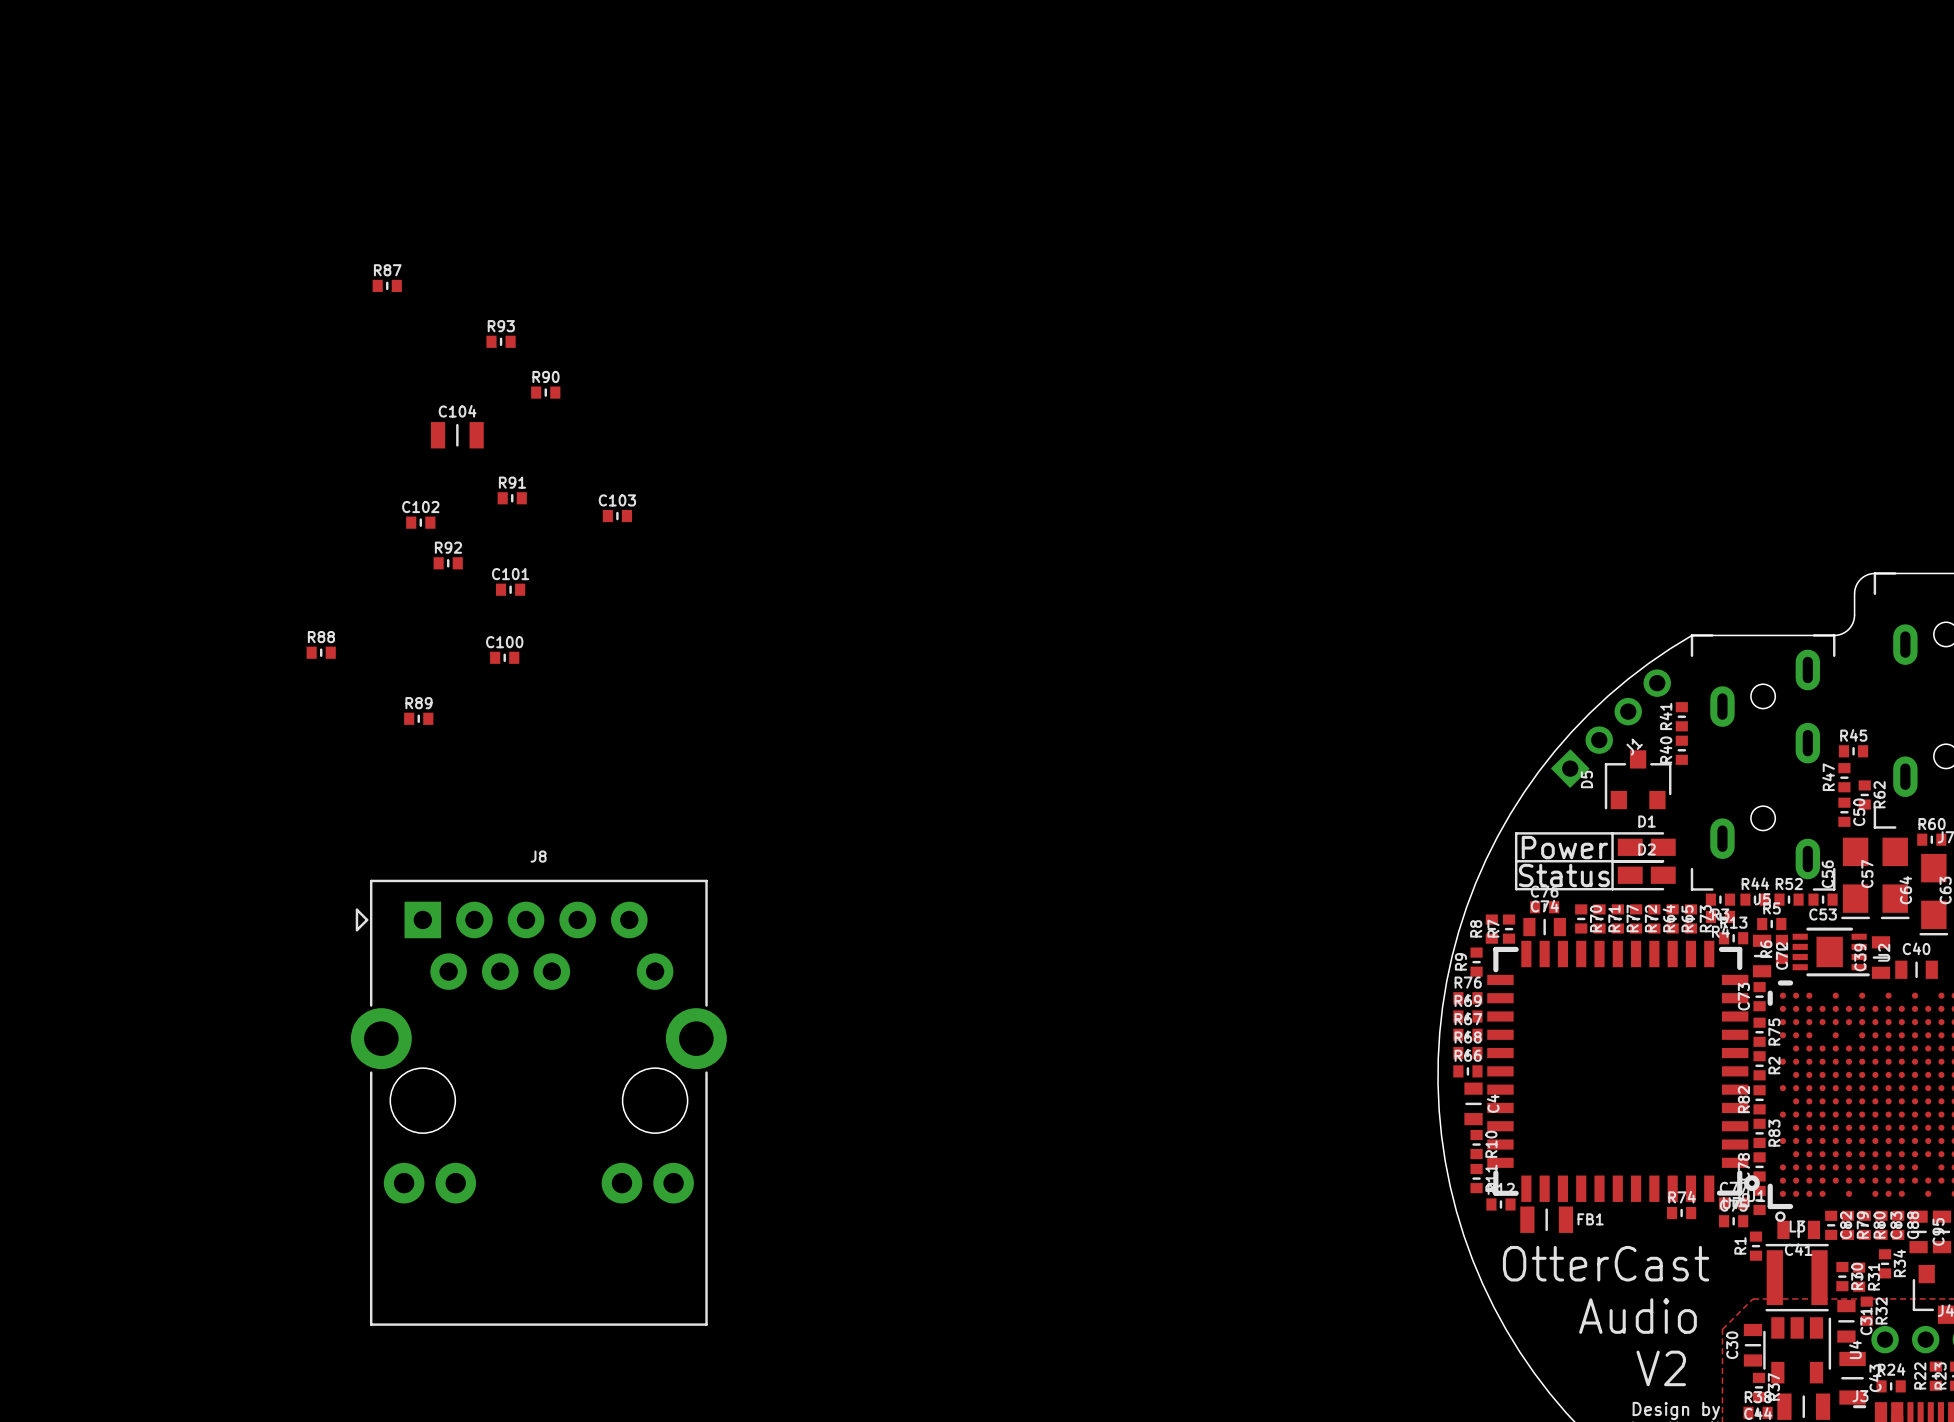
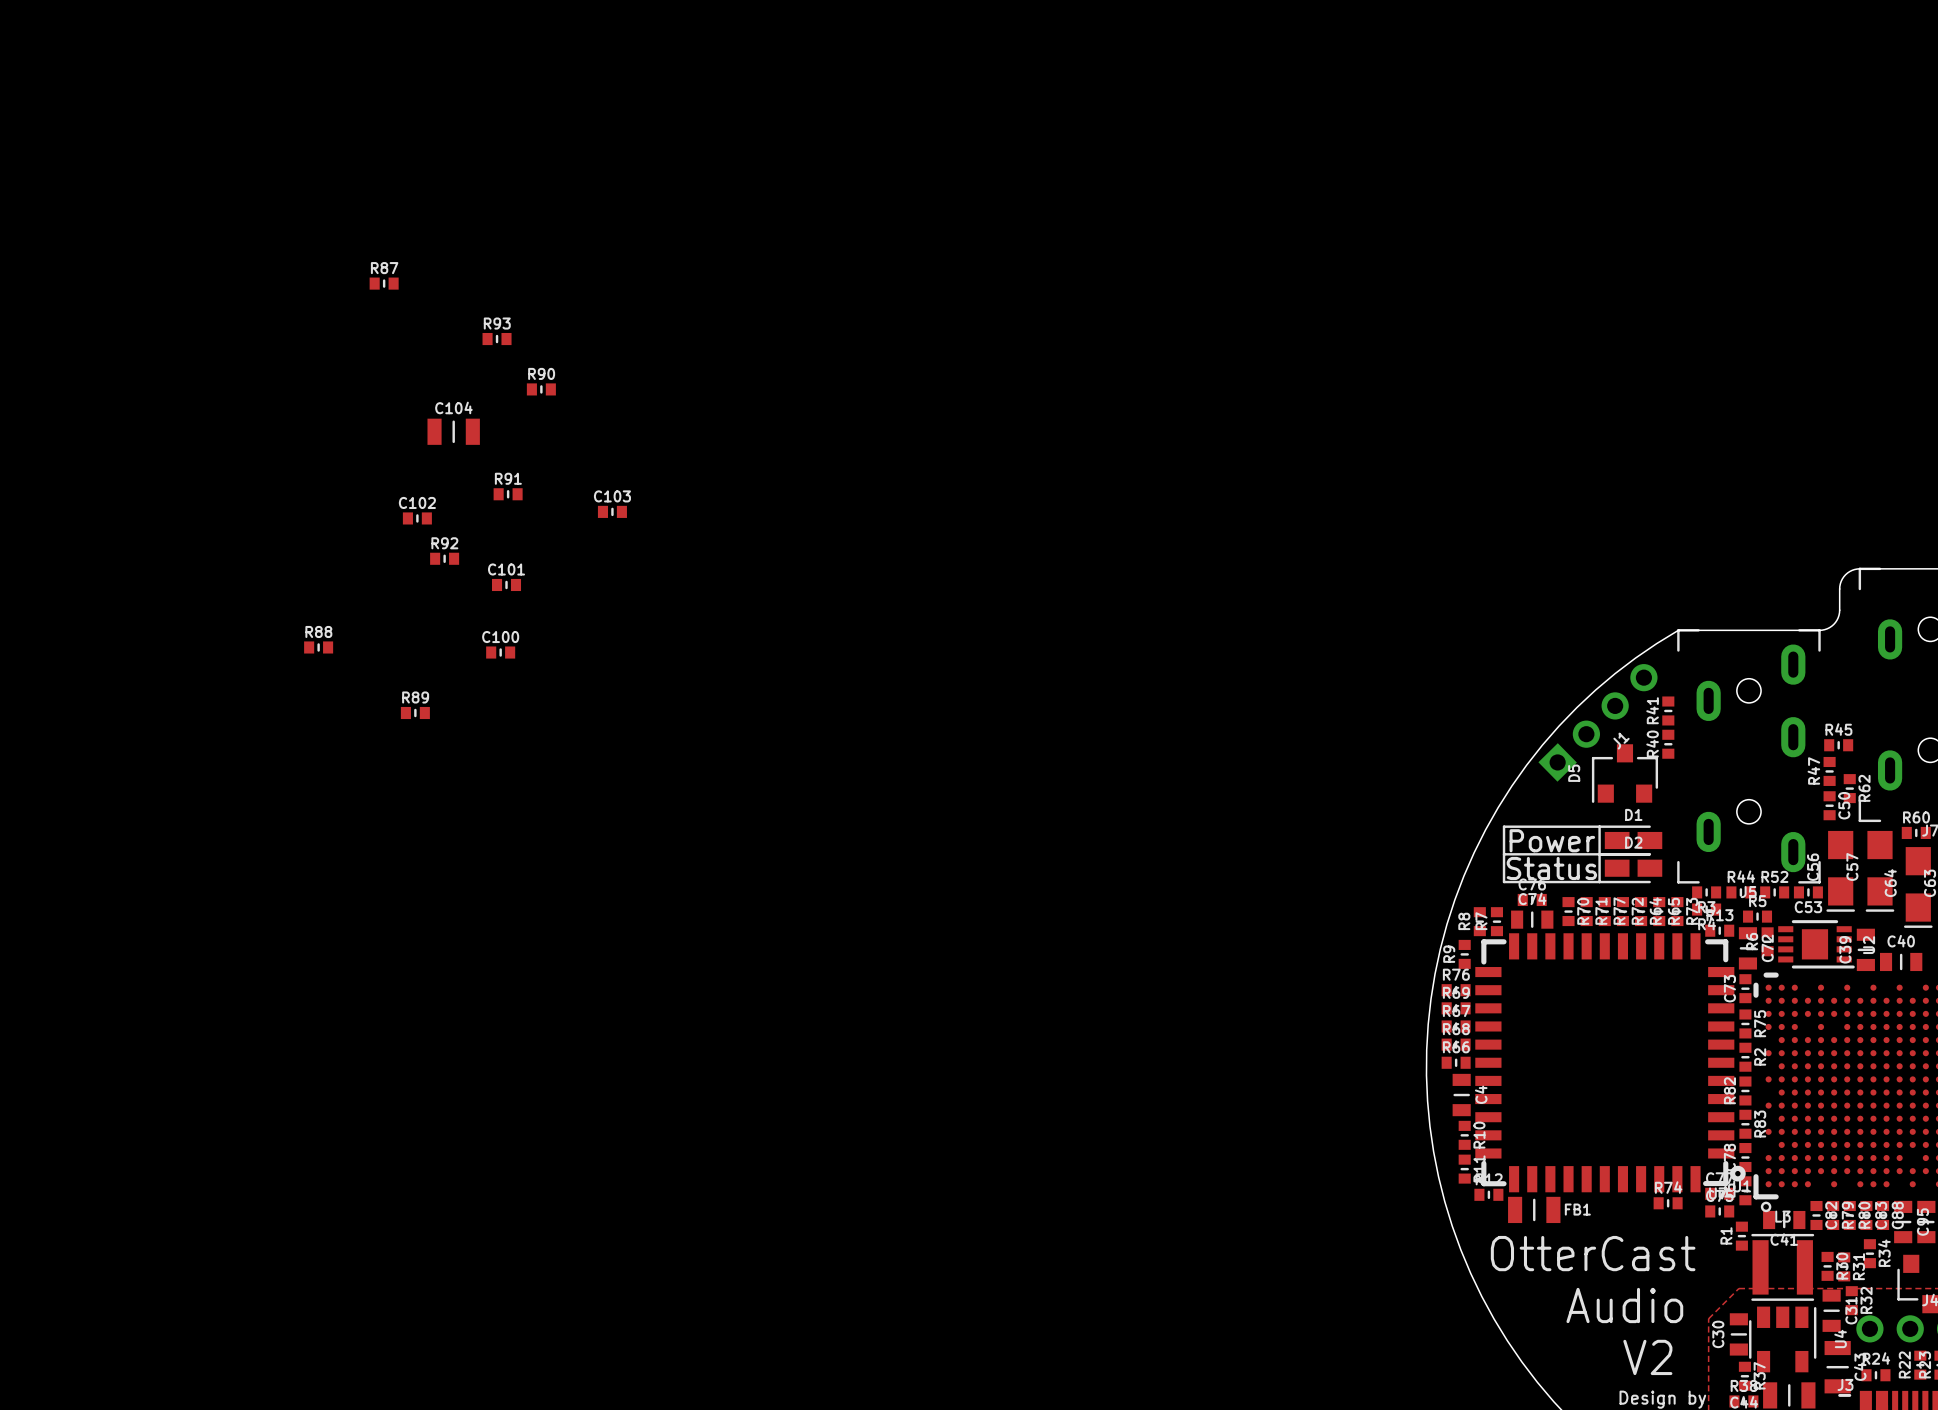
J8: (538, 1102) -> none

